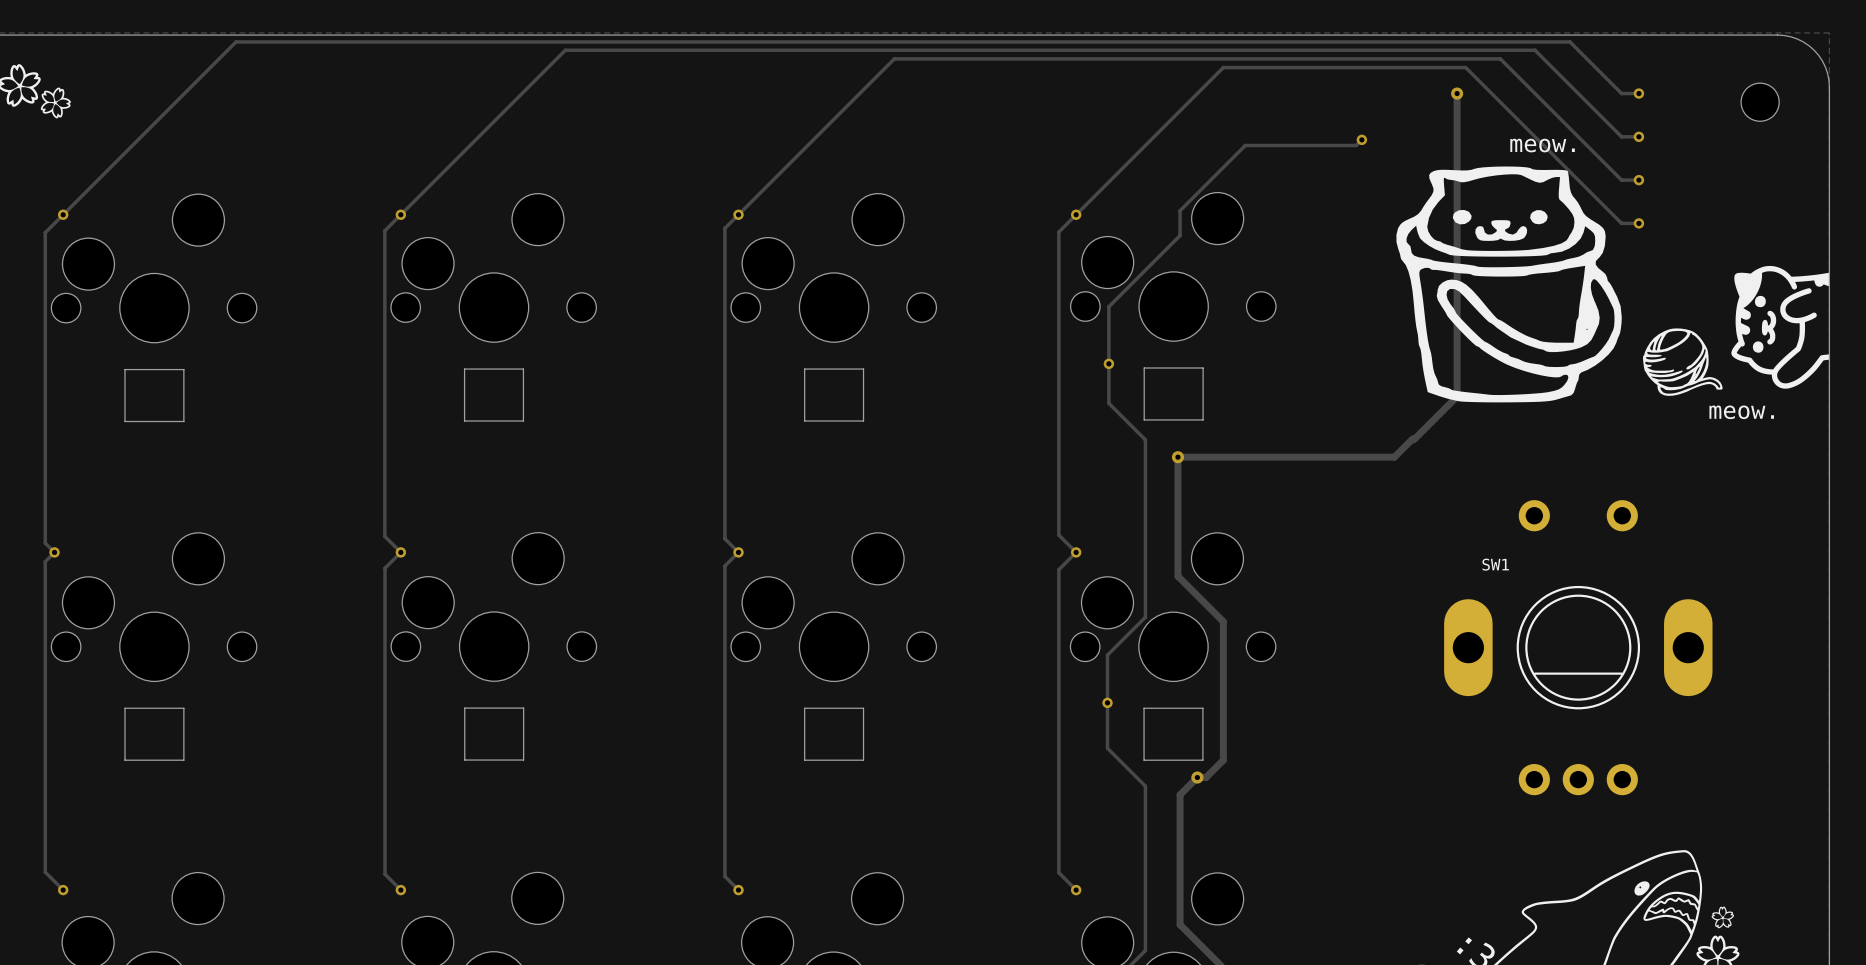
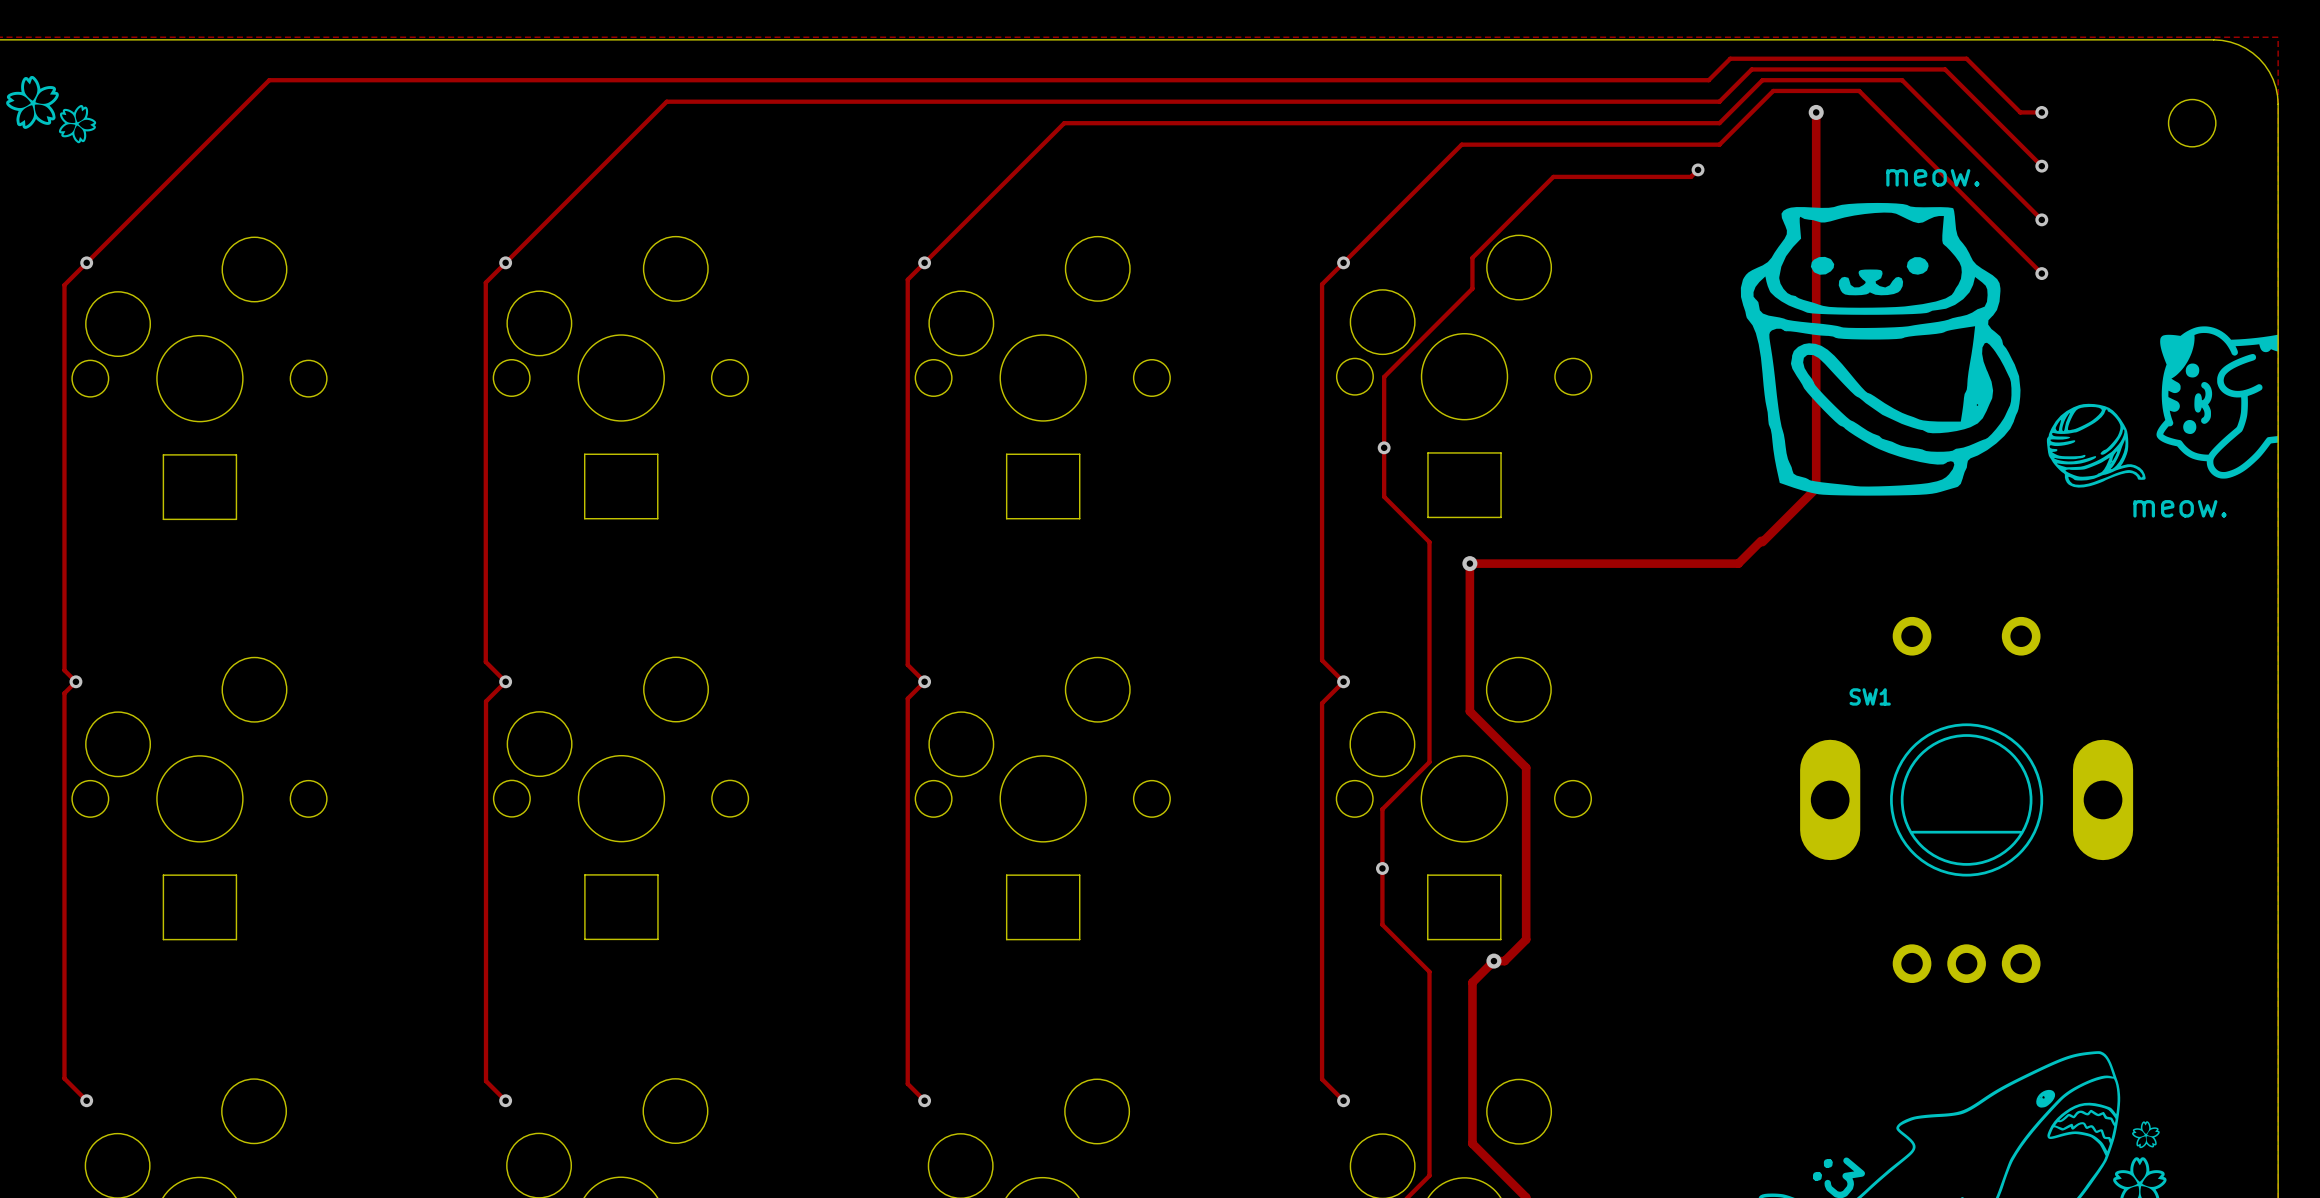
track: (1387, 50) (565, 50) (530, 84) -> (1751, 69) (1719, 101) (666, 101)
track: (1535, 50) (1621, 136) (1638, 136) -> (1869, 69) (1945, 69) (2041, 166)
track: none -> (1912, 58) (1966, 58)
track: (1578, 50) (1570, 41) (235, 41) (210, 67) -> (1526, 80) (269, 80)
track: (1405, 58) (894, 58) (851, 102) -> (1762, 80) (1719, 123) (1064, 123)
track: (1500, 58) (1621, 180) (1638, 180) -> (1826, 80) (1902, 80) (2041, 219)
track: (1223, 67) (1171, 119) -> none
track: (1370, 67) (1413, 67) -> (1708, 80) (1730, 58)
track: (1465, 67) (1621, 223) (1638, 223) -> (1461, 144) (1719, 144) (1773, 90) (1859, 90) (2041, 273)

